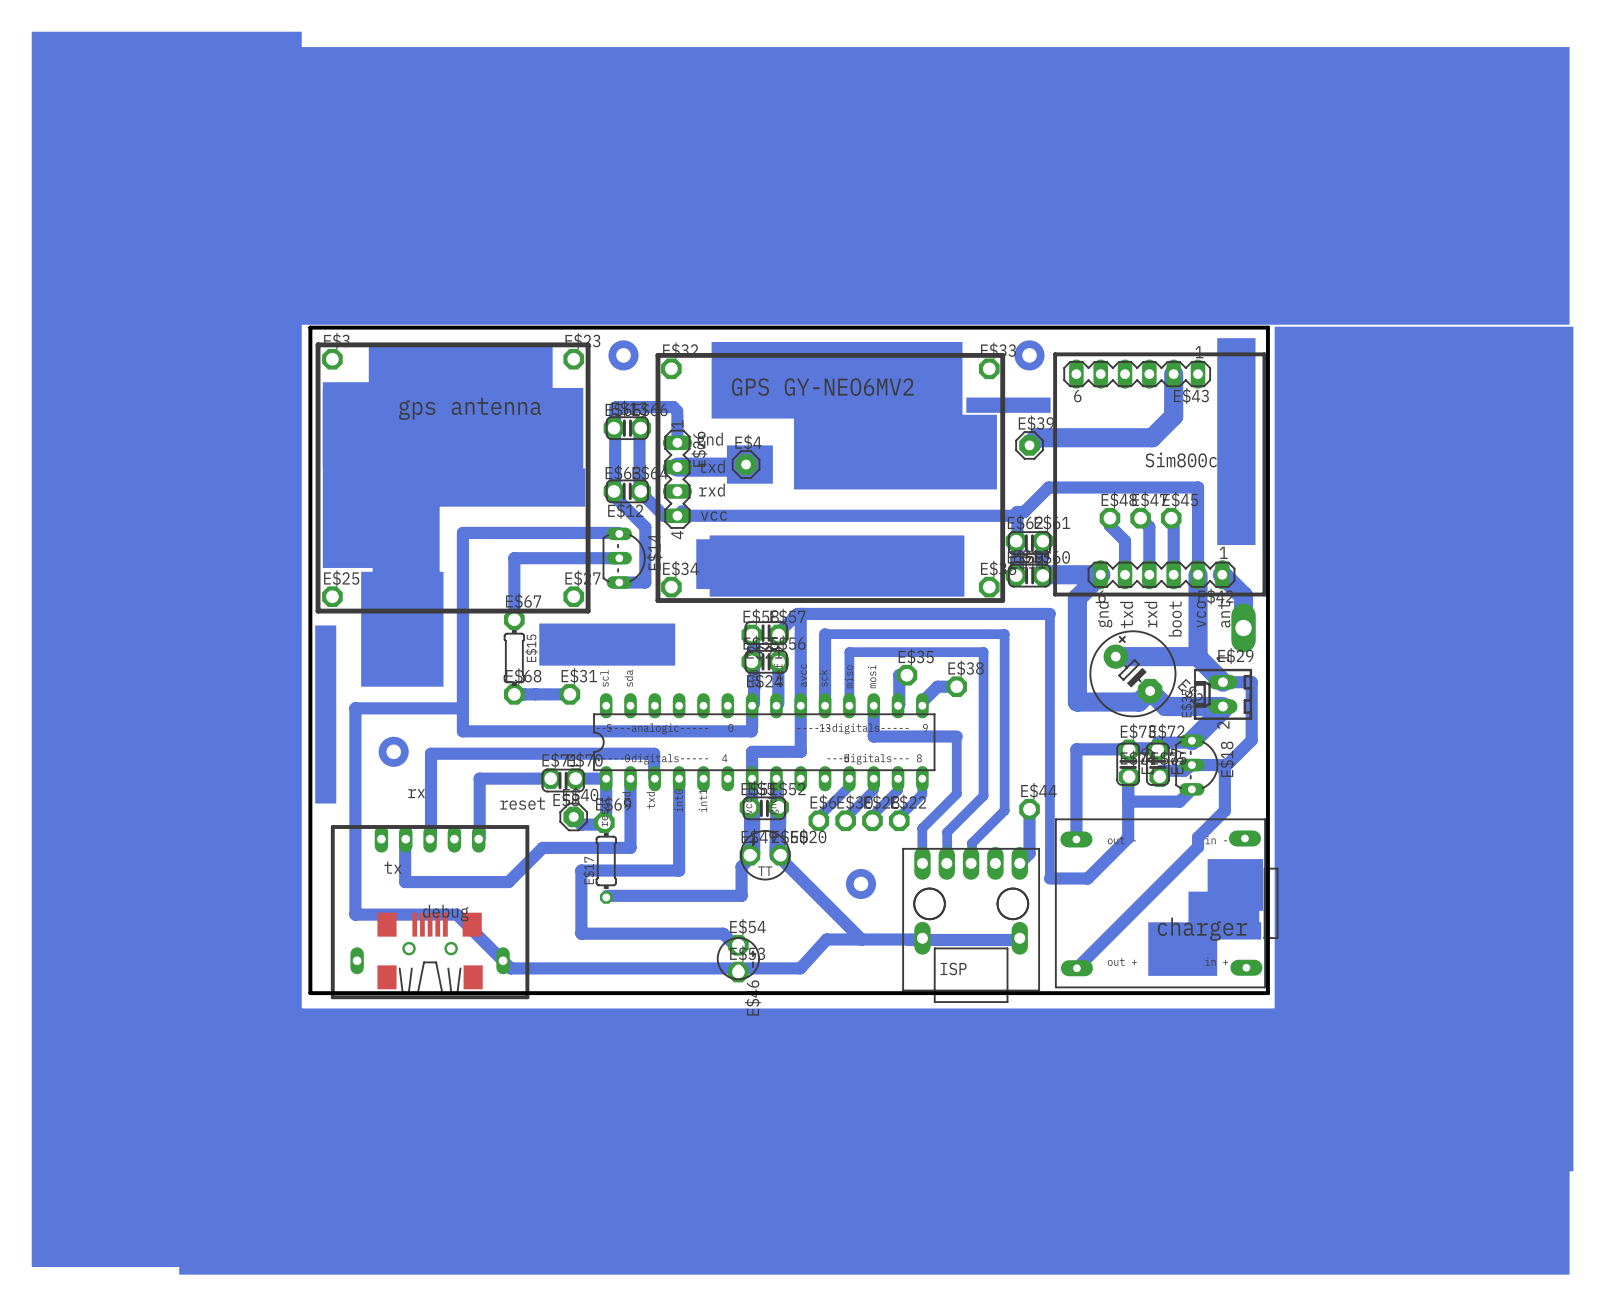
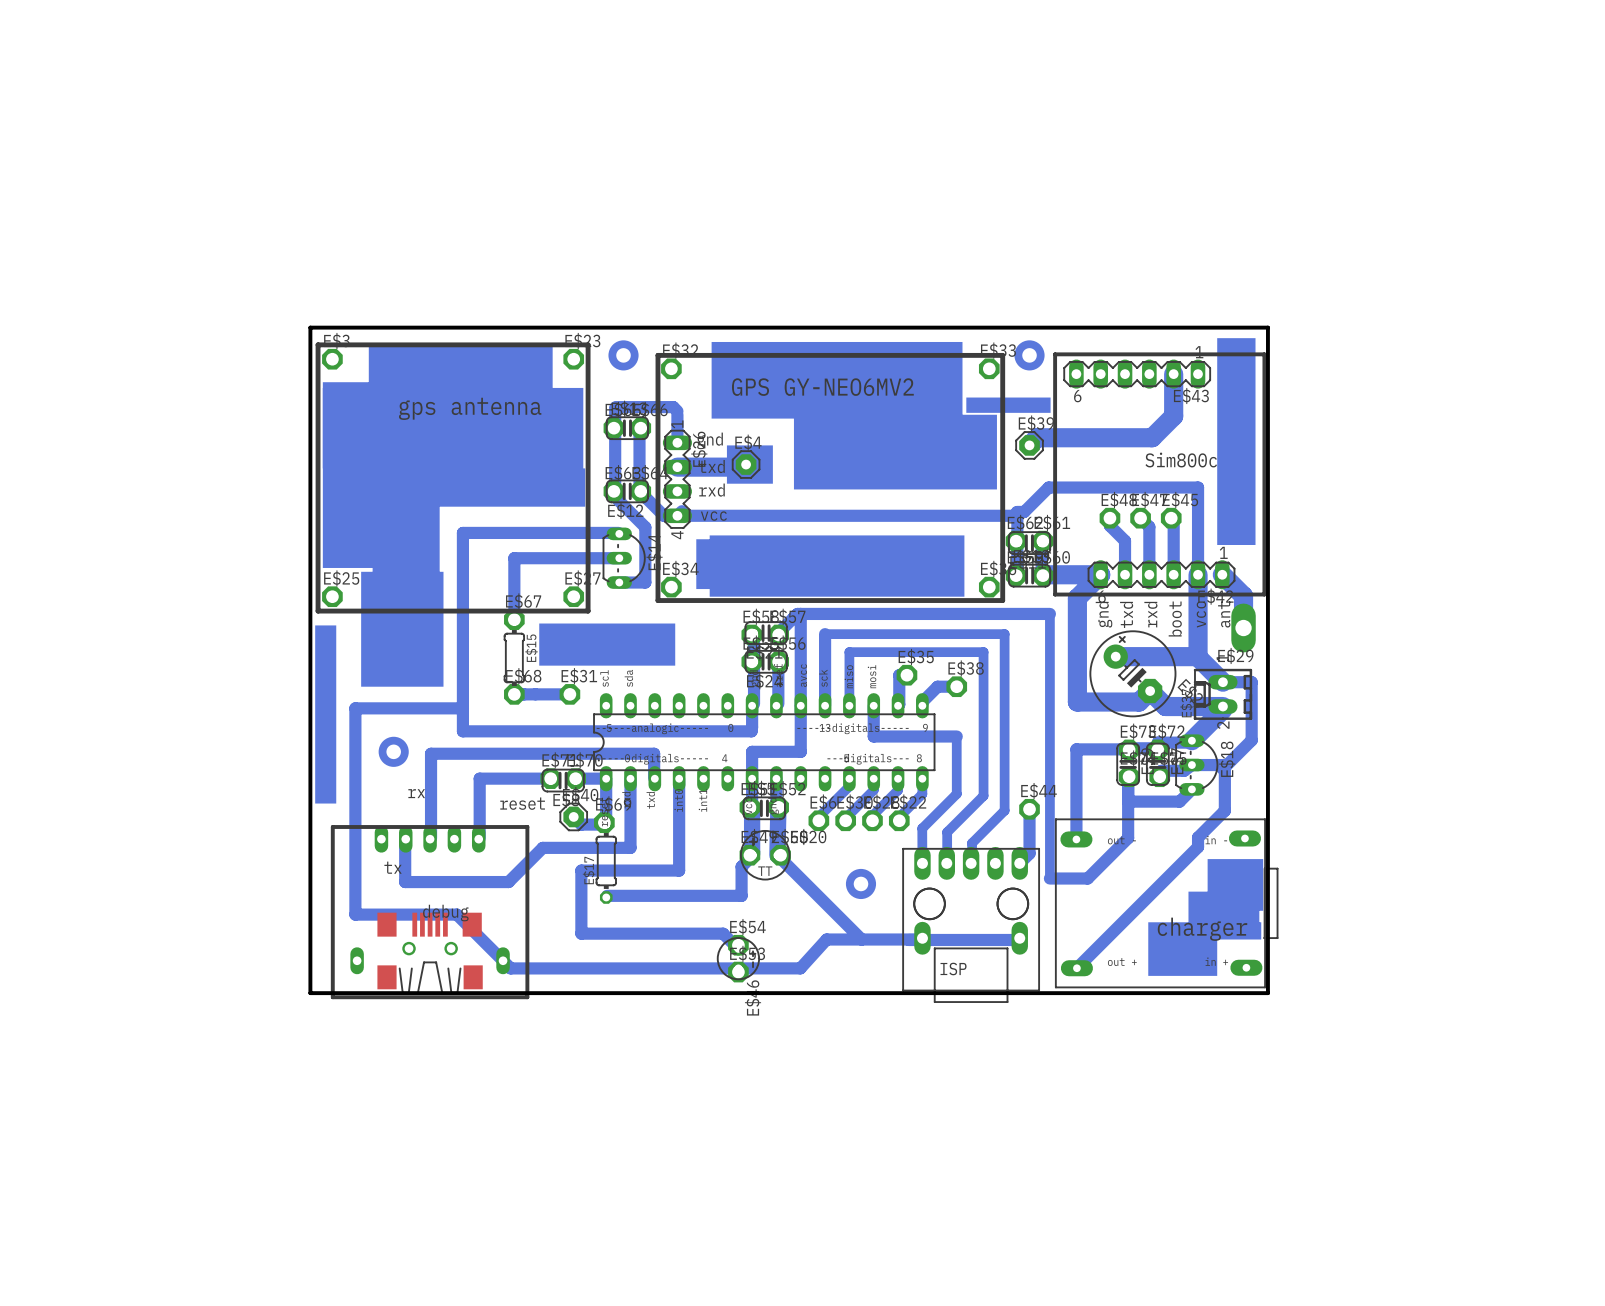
drawing: [31, 31, 1574, 1275] -> none

